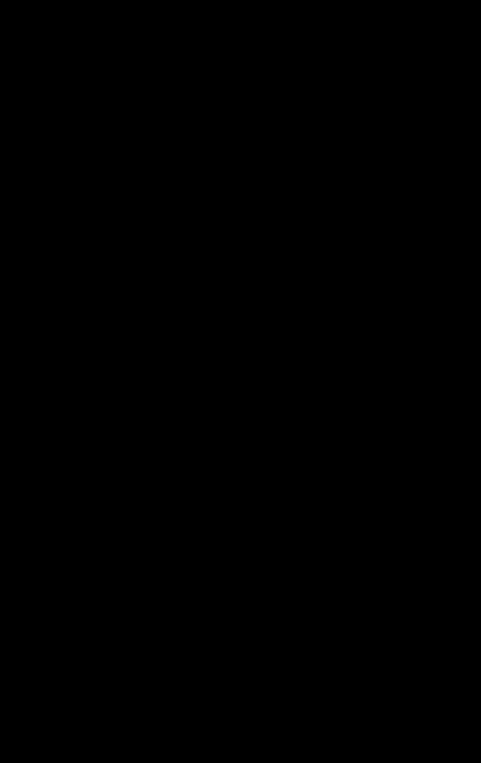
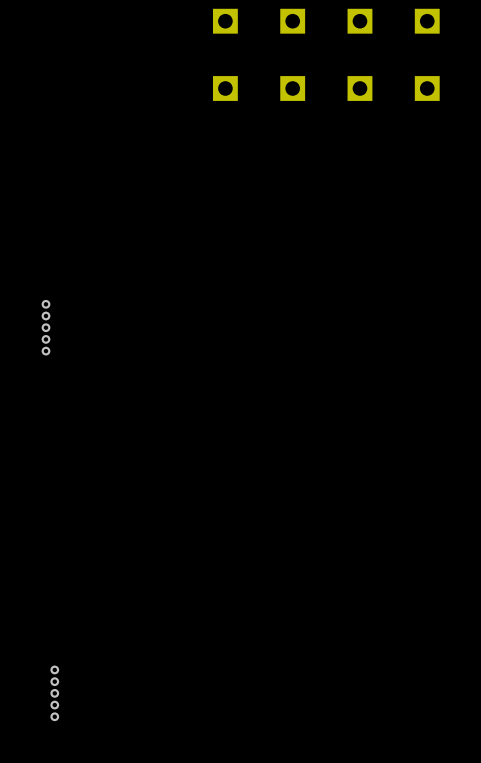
part: none -> (225, 21)
part: none -> (292, 21)
part: none -> (359, 21)
part: none -> (427, 21)
part: none -> (225, 88)
part: none -> (292, 88)
part: none -> (359, 88)
part: none -> (427, 88)
via: none -> (45, 304)
via: none -> (45, 316)
via: none -> (45, 327)
via: none -> (45, 339)
via: none -> (45, 351)
via: none -> (54, 669)
via: none -> (54, 681)
via: none -> (54, 693)
via: none -> (54, 705)
via: none -> (54, 716)

